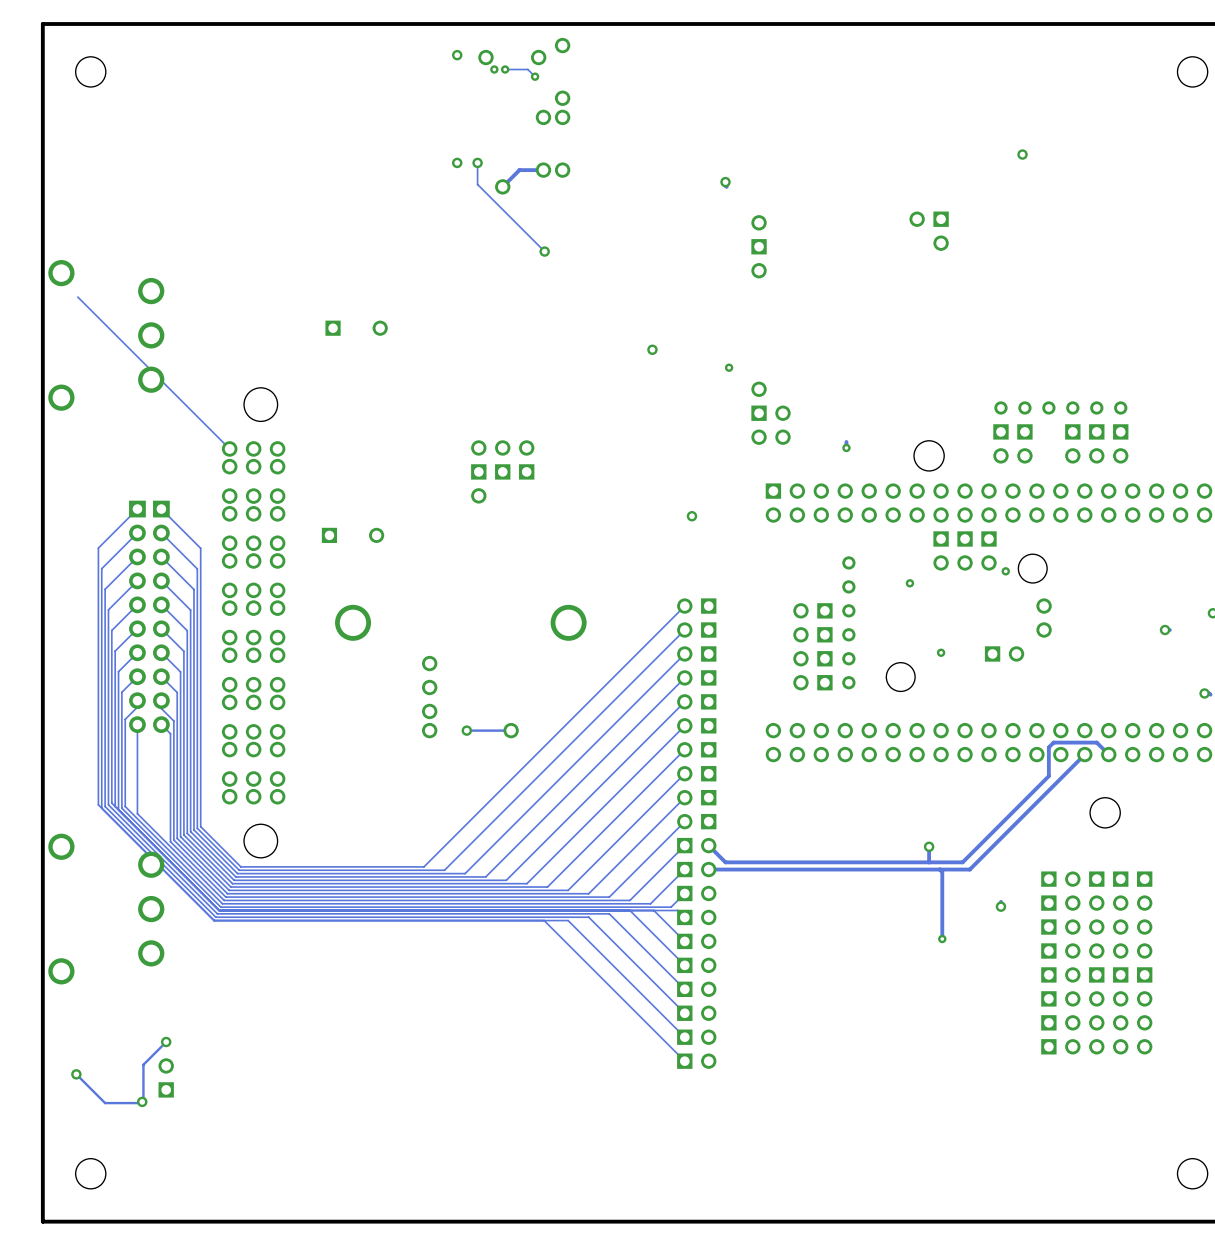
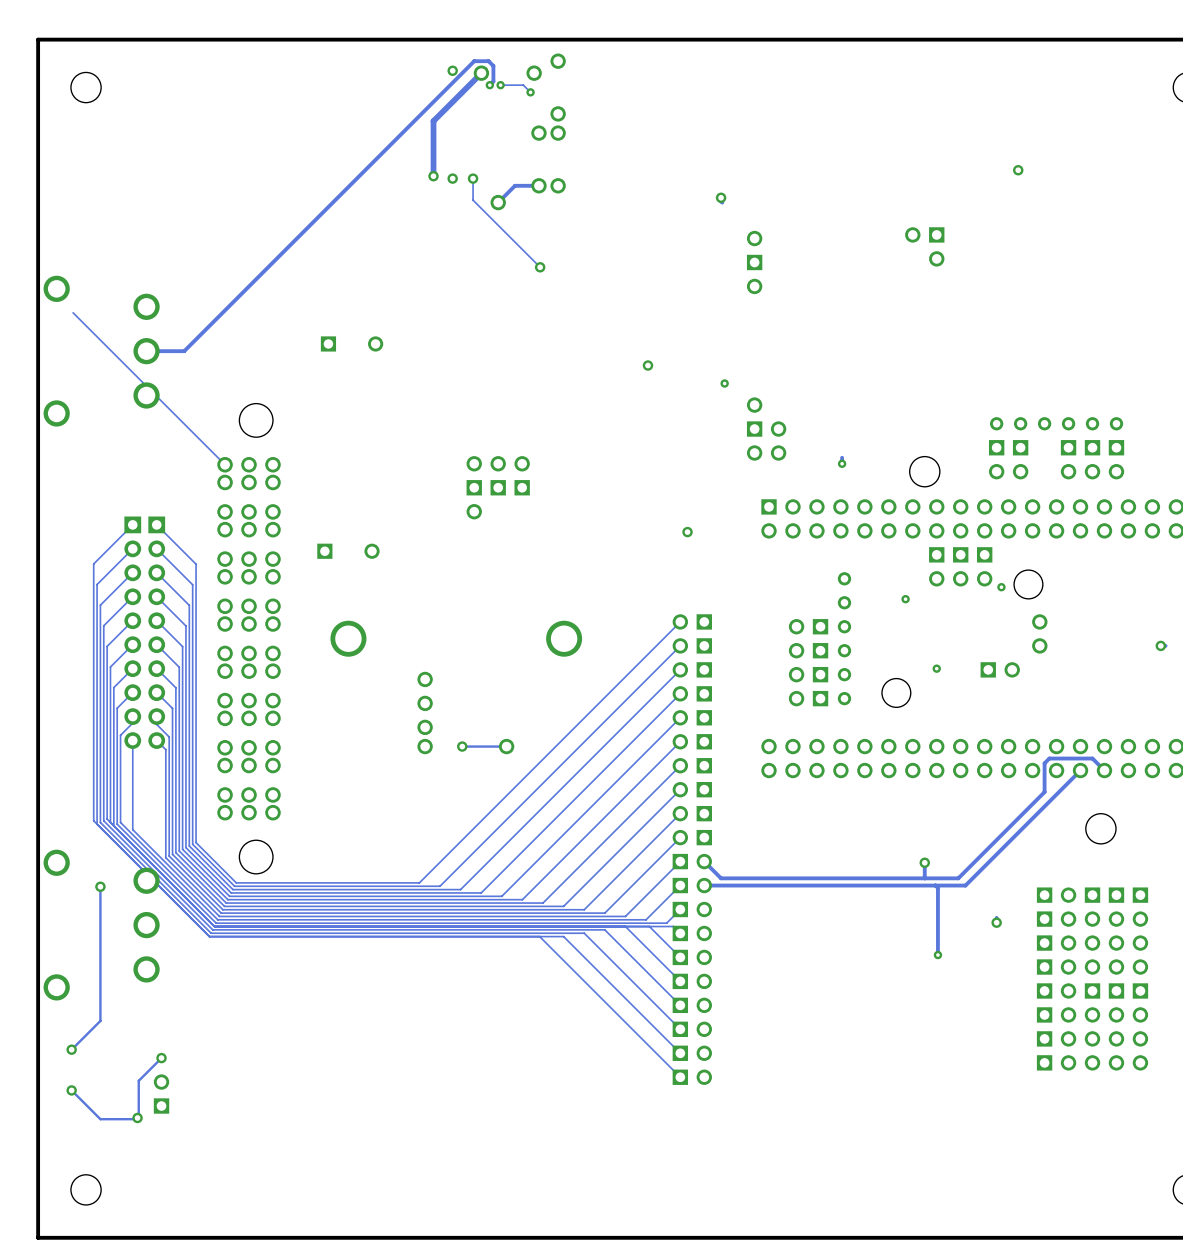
track: none -> (481, 73) (433, 121) (433, 176)
track: none -> (489, 85) (493, 81) (493, 65) (488, 61) (474, 61) (184, 351) (146, 351)
via: none -> (433, 176)
track: none -> (100, 886) (100, 1020) (71, 1049)
via: none -> (100, 886)
via: none -> (71, 1049)

